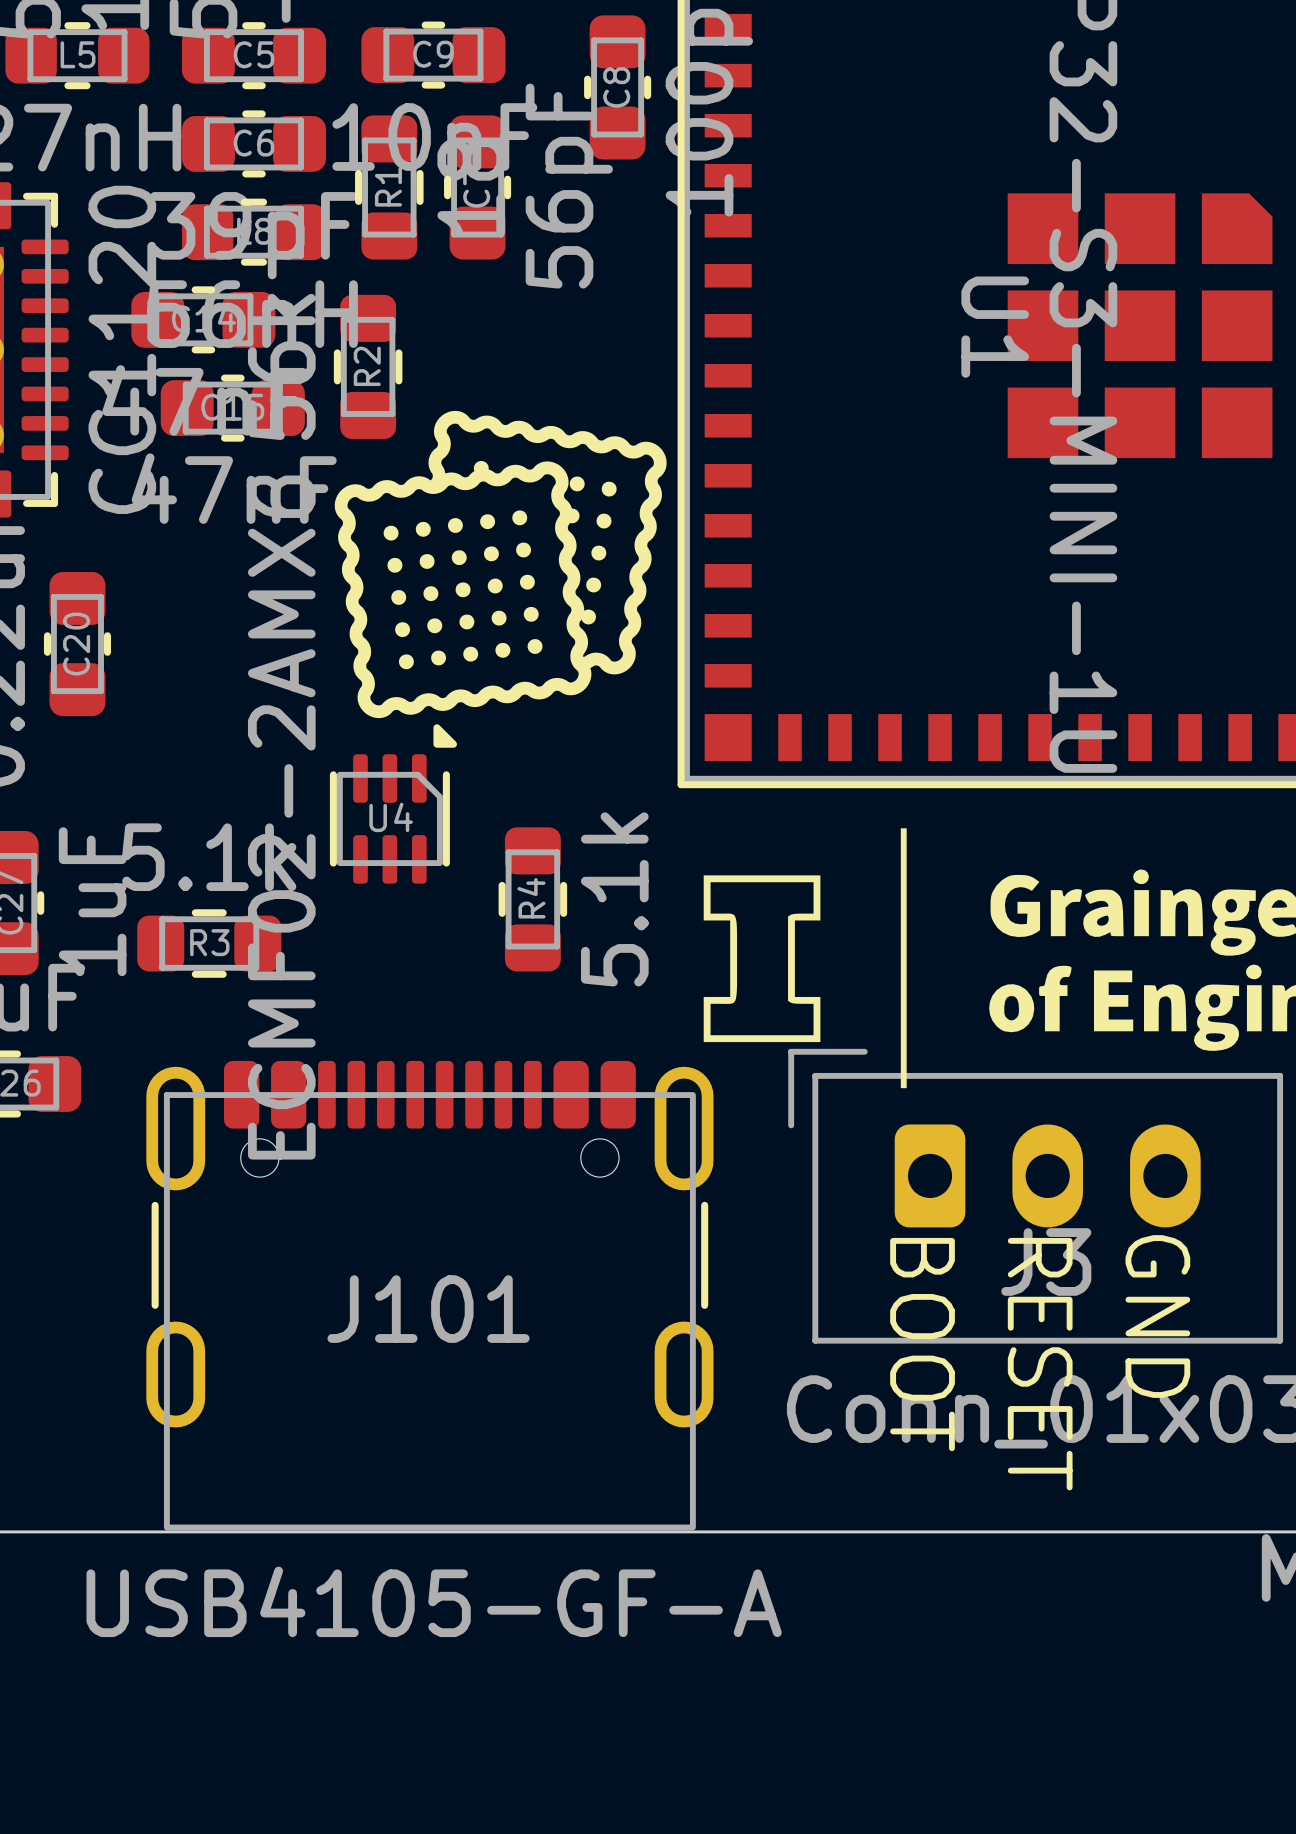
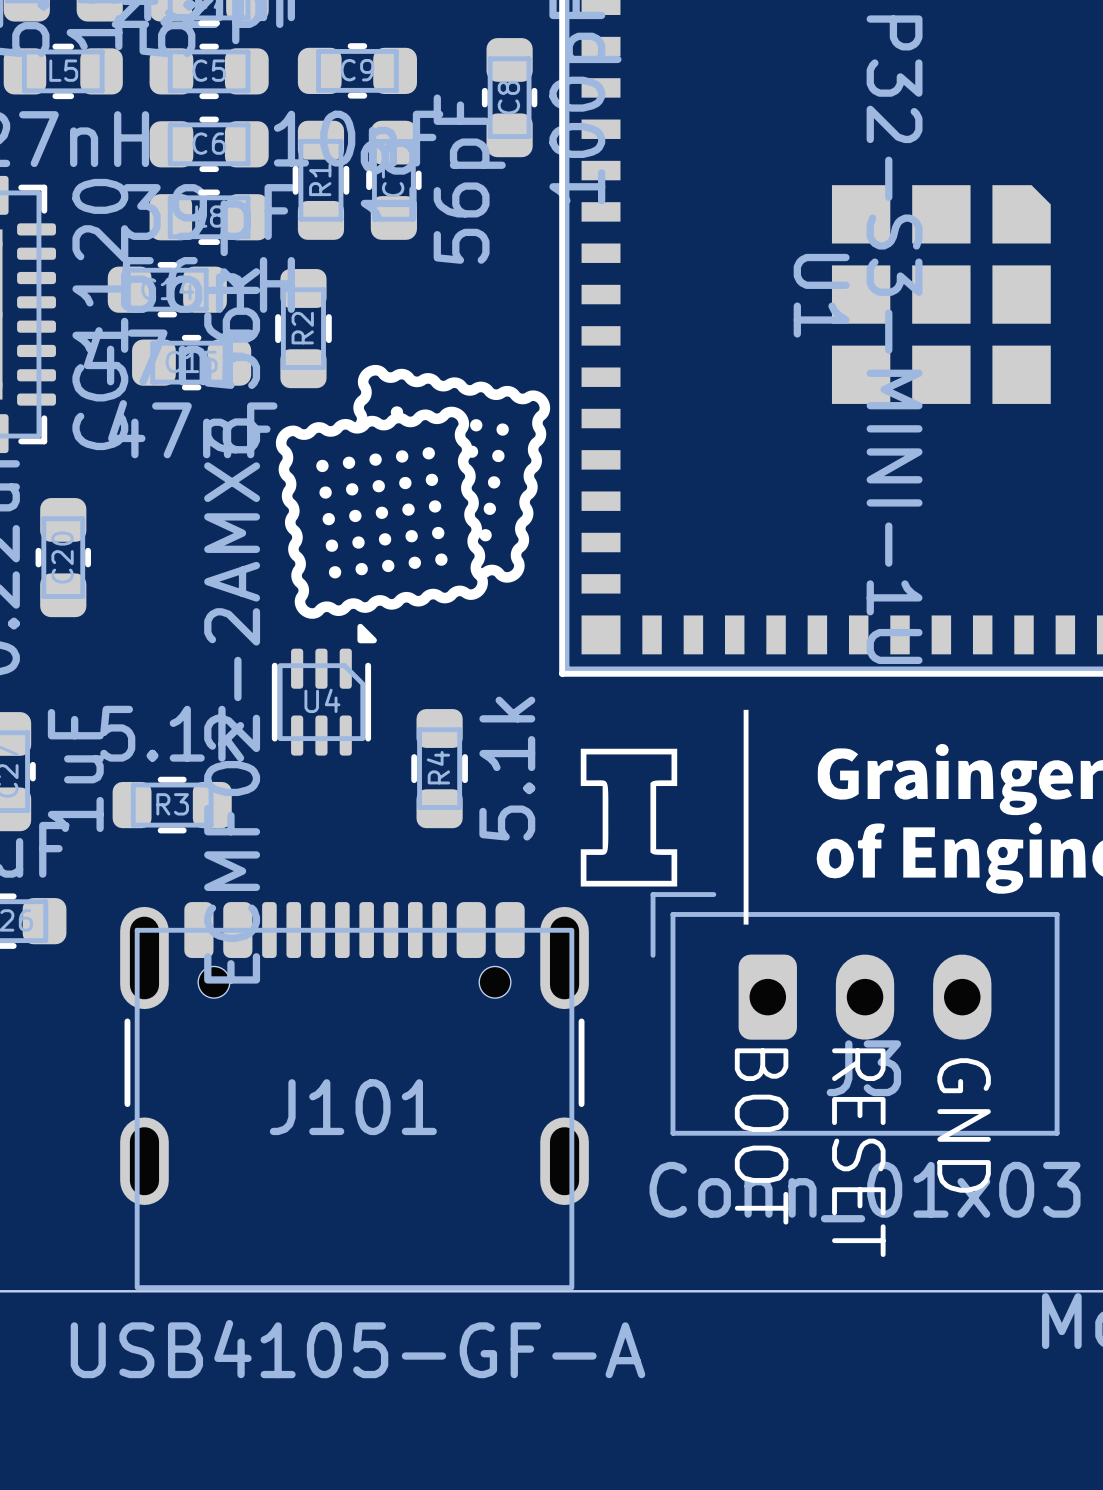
text position: GND (1157, 1316) -> GND (964, 1125)

